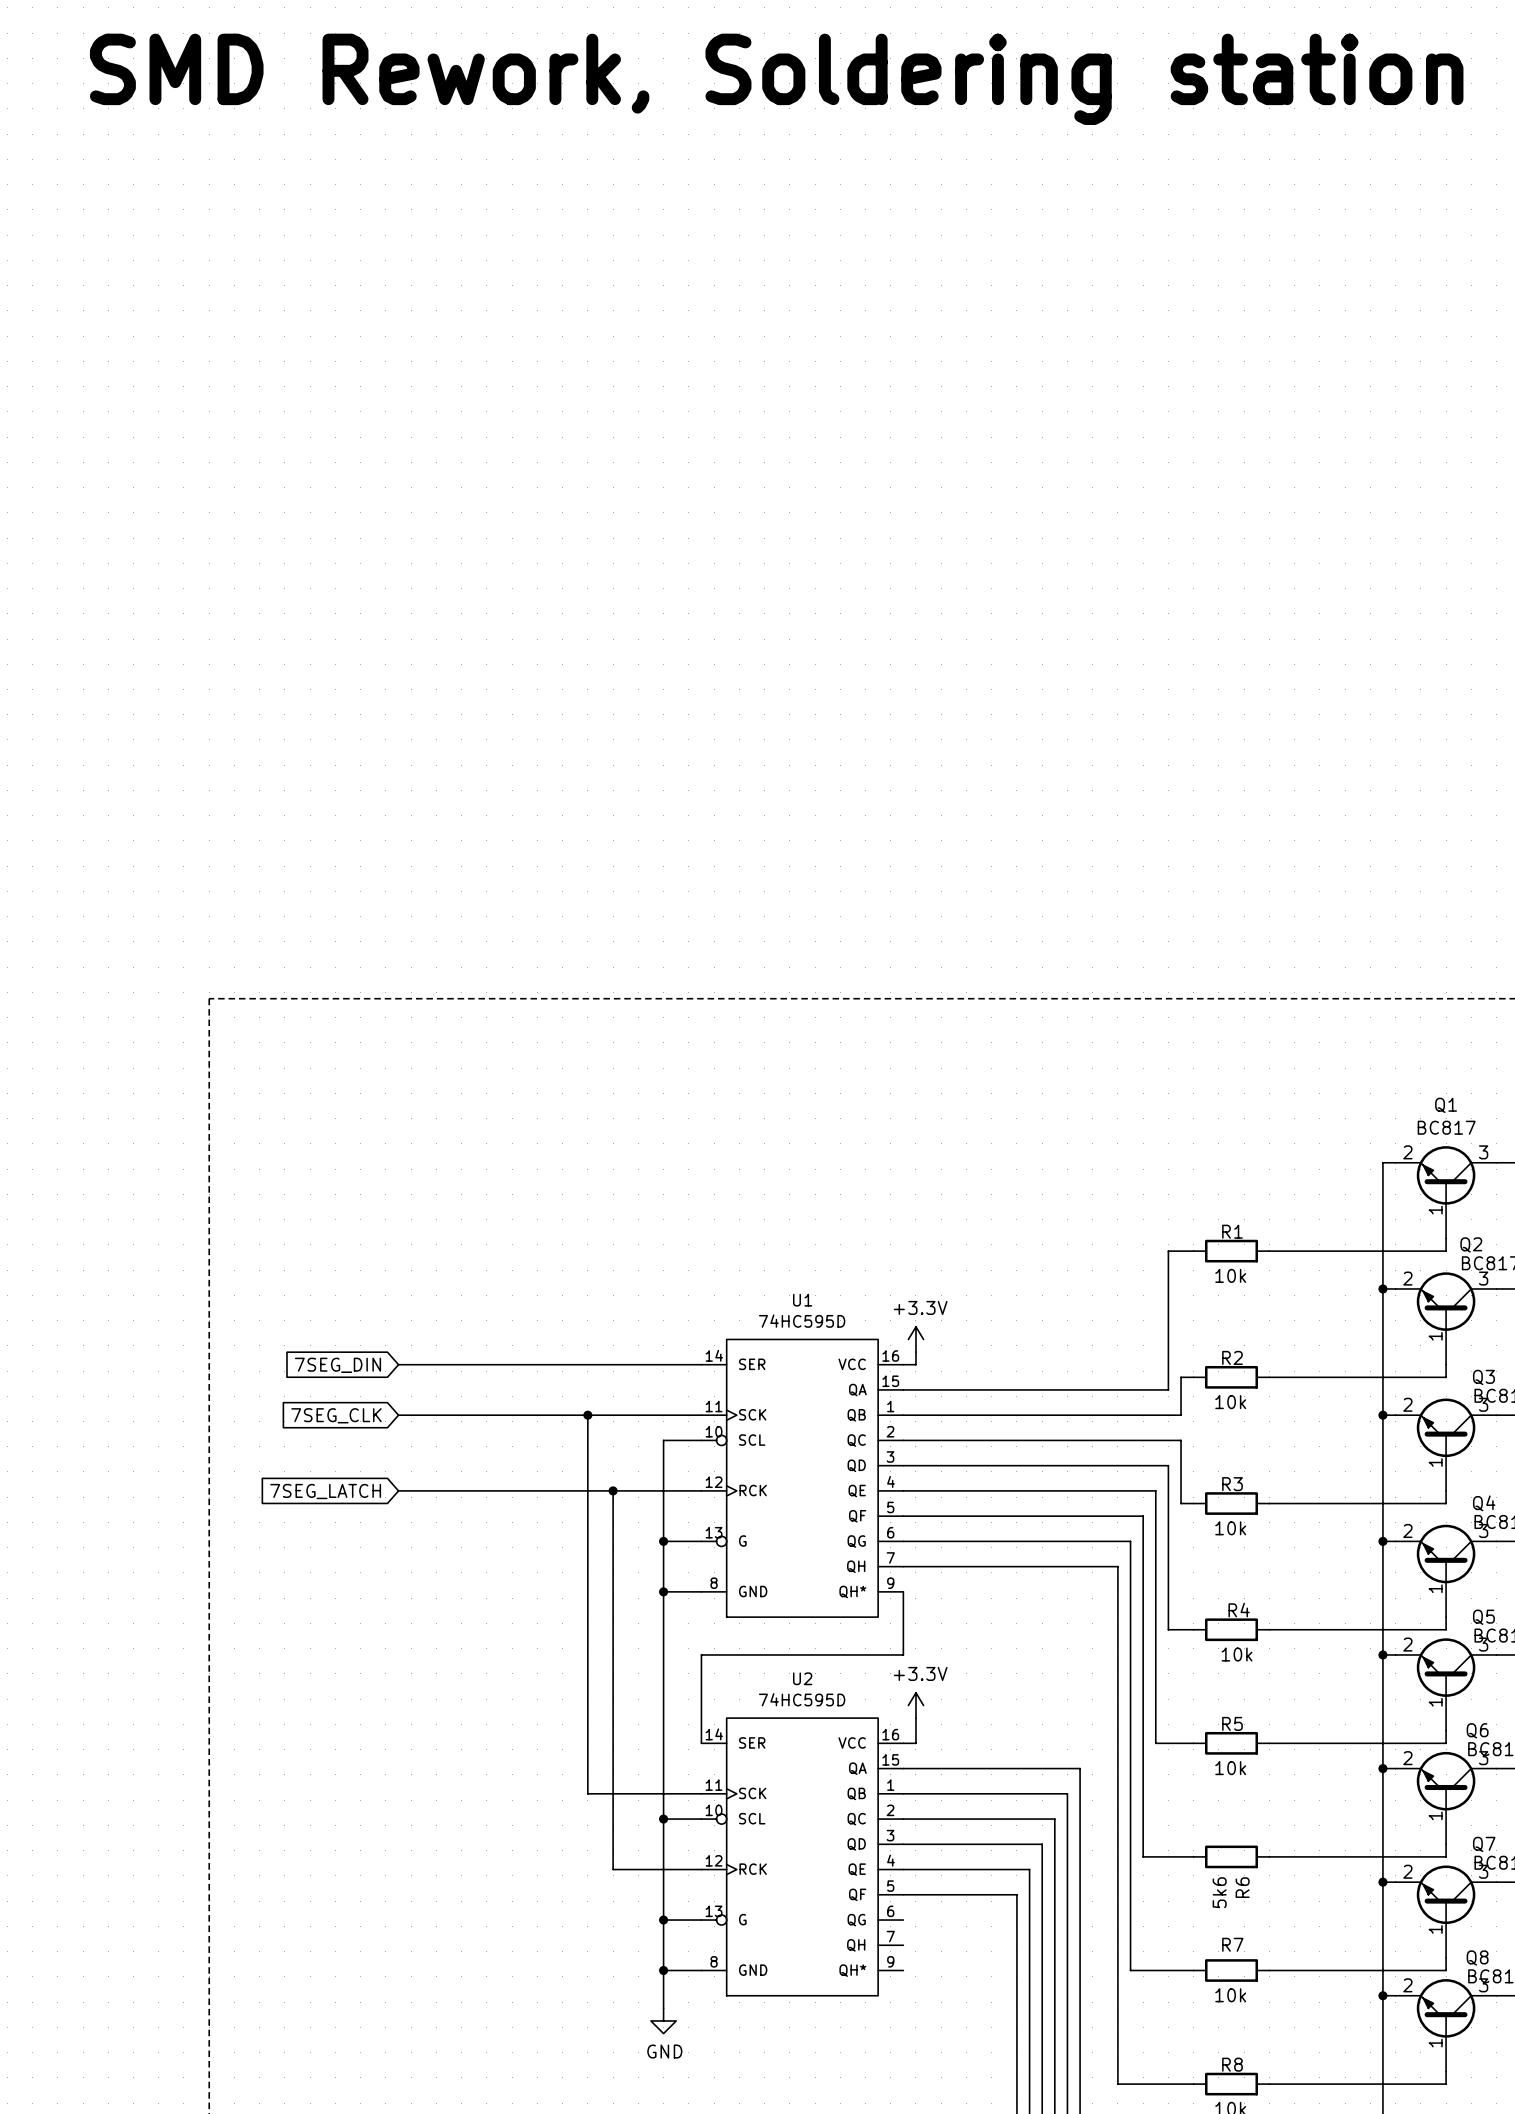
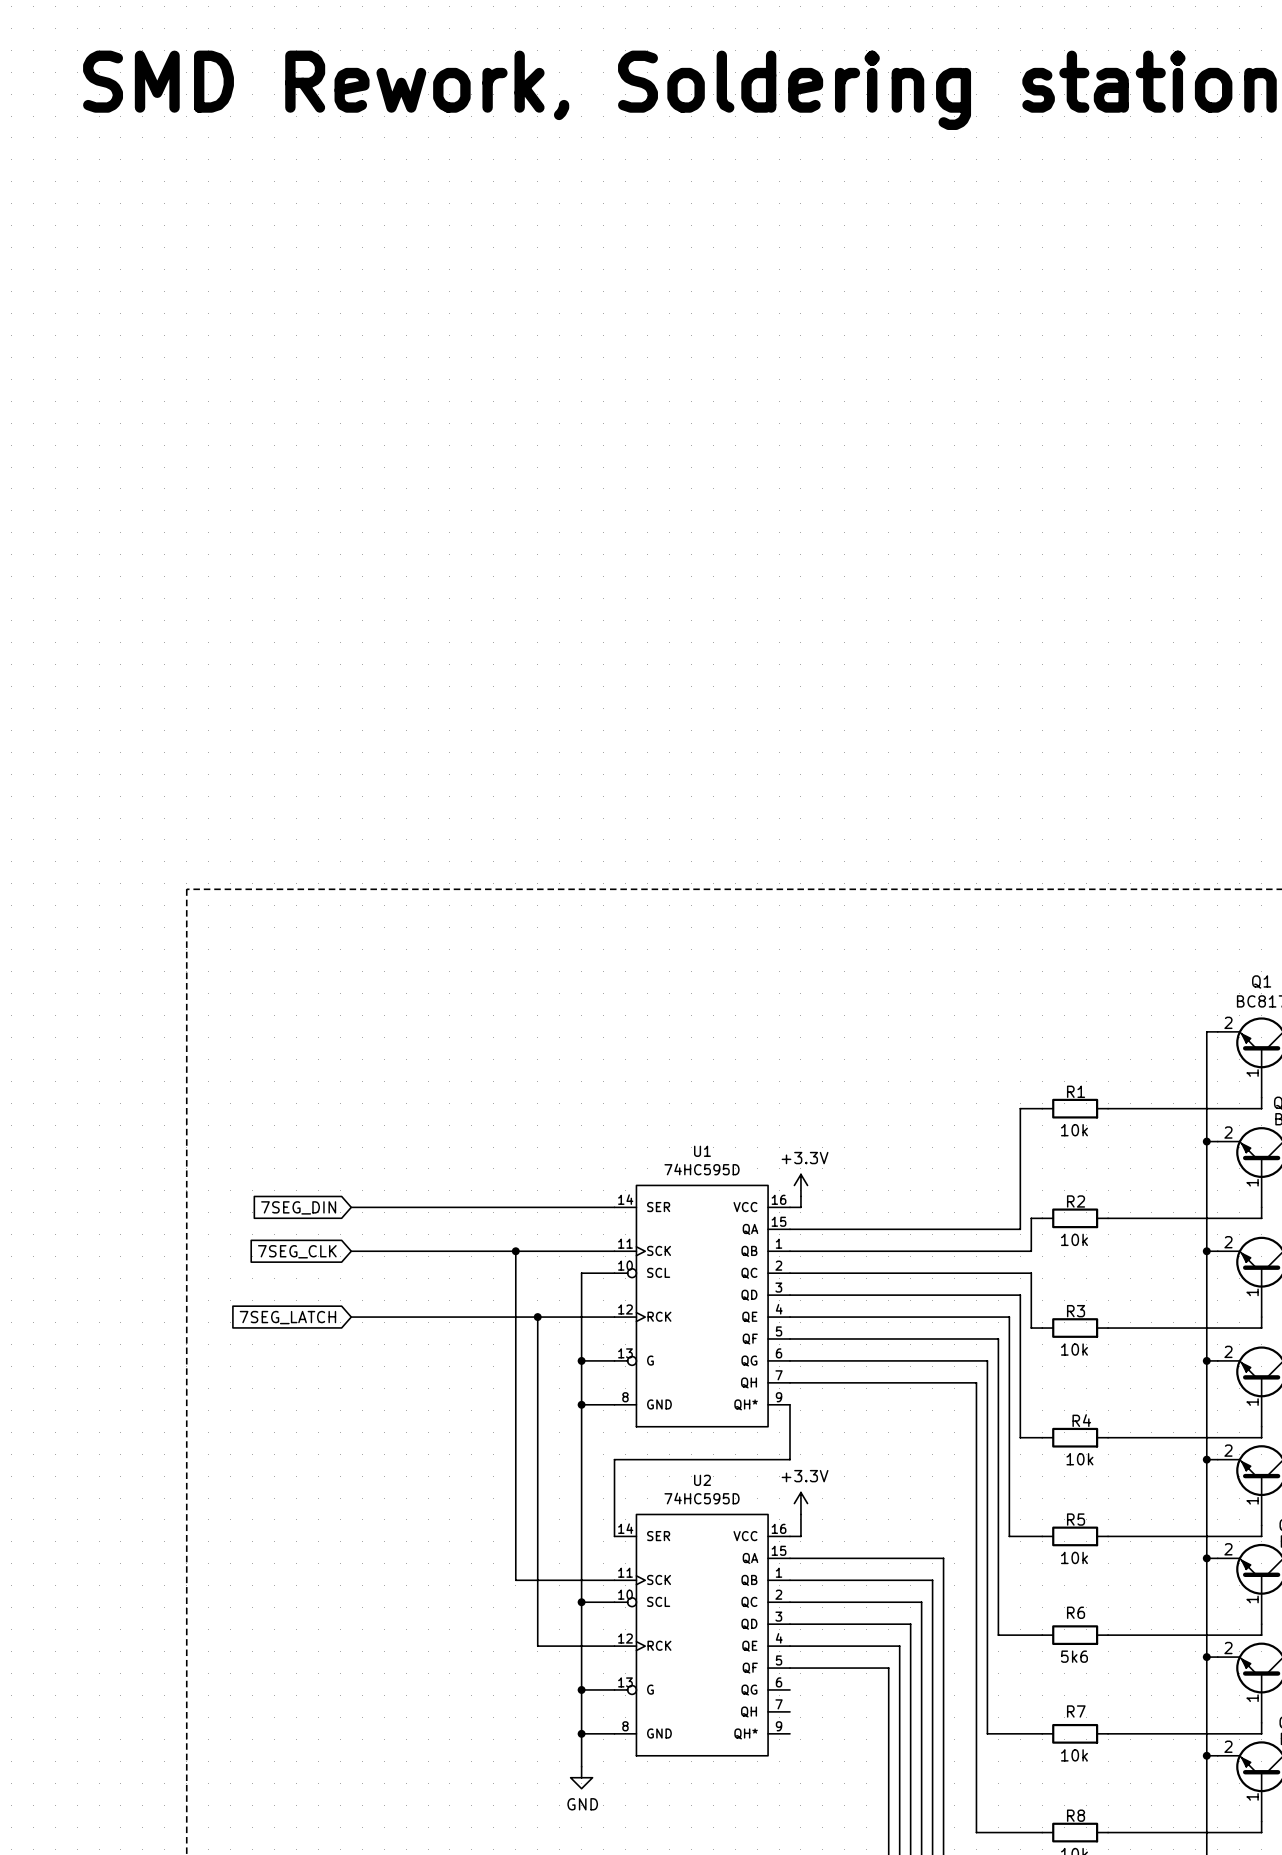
R6 name rotation: 0° (1242, 1887) -> 90° clockwise (1076, 1612)
R6 name position: R6 (1242, 1887) -> R6 (1076, 1612)
R6 value rotation: 0° (1219, 1892) -> 90° clockwise (1074, 1656)

